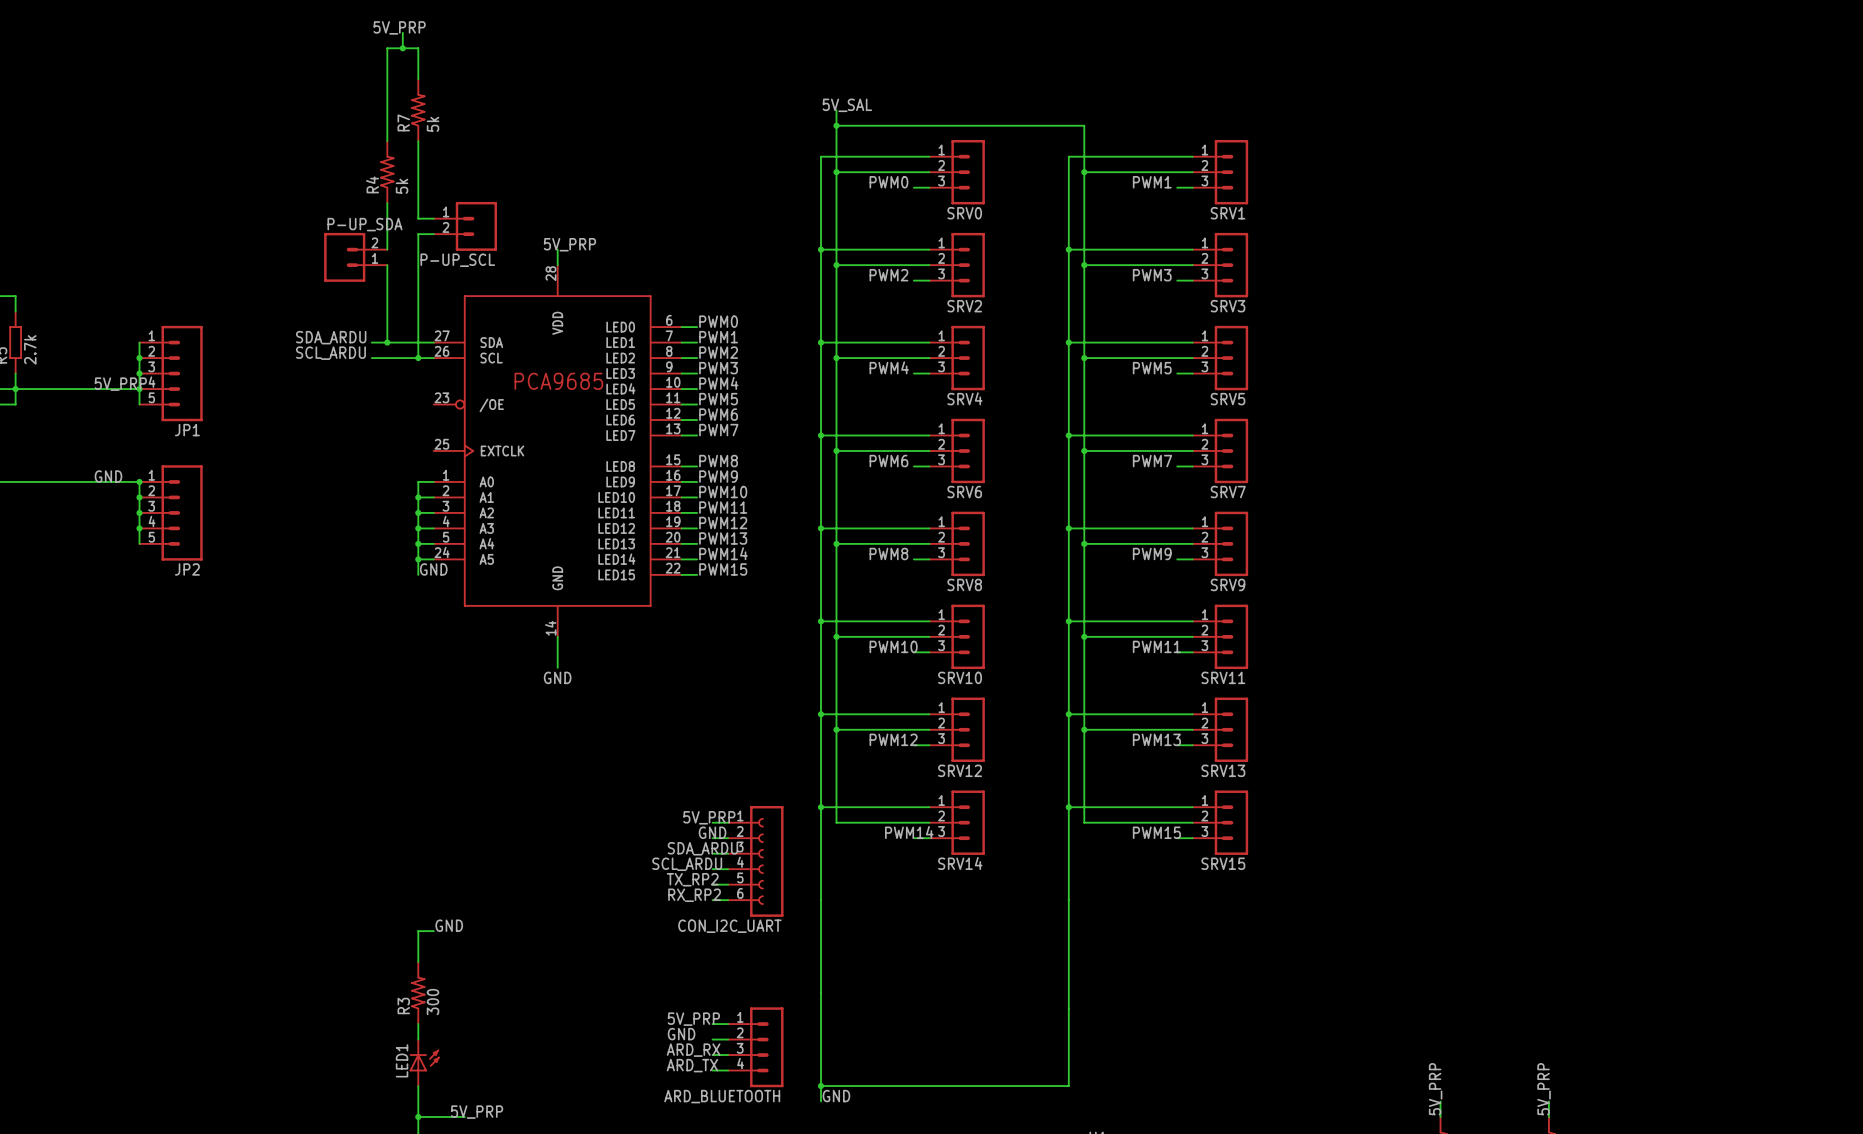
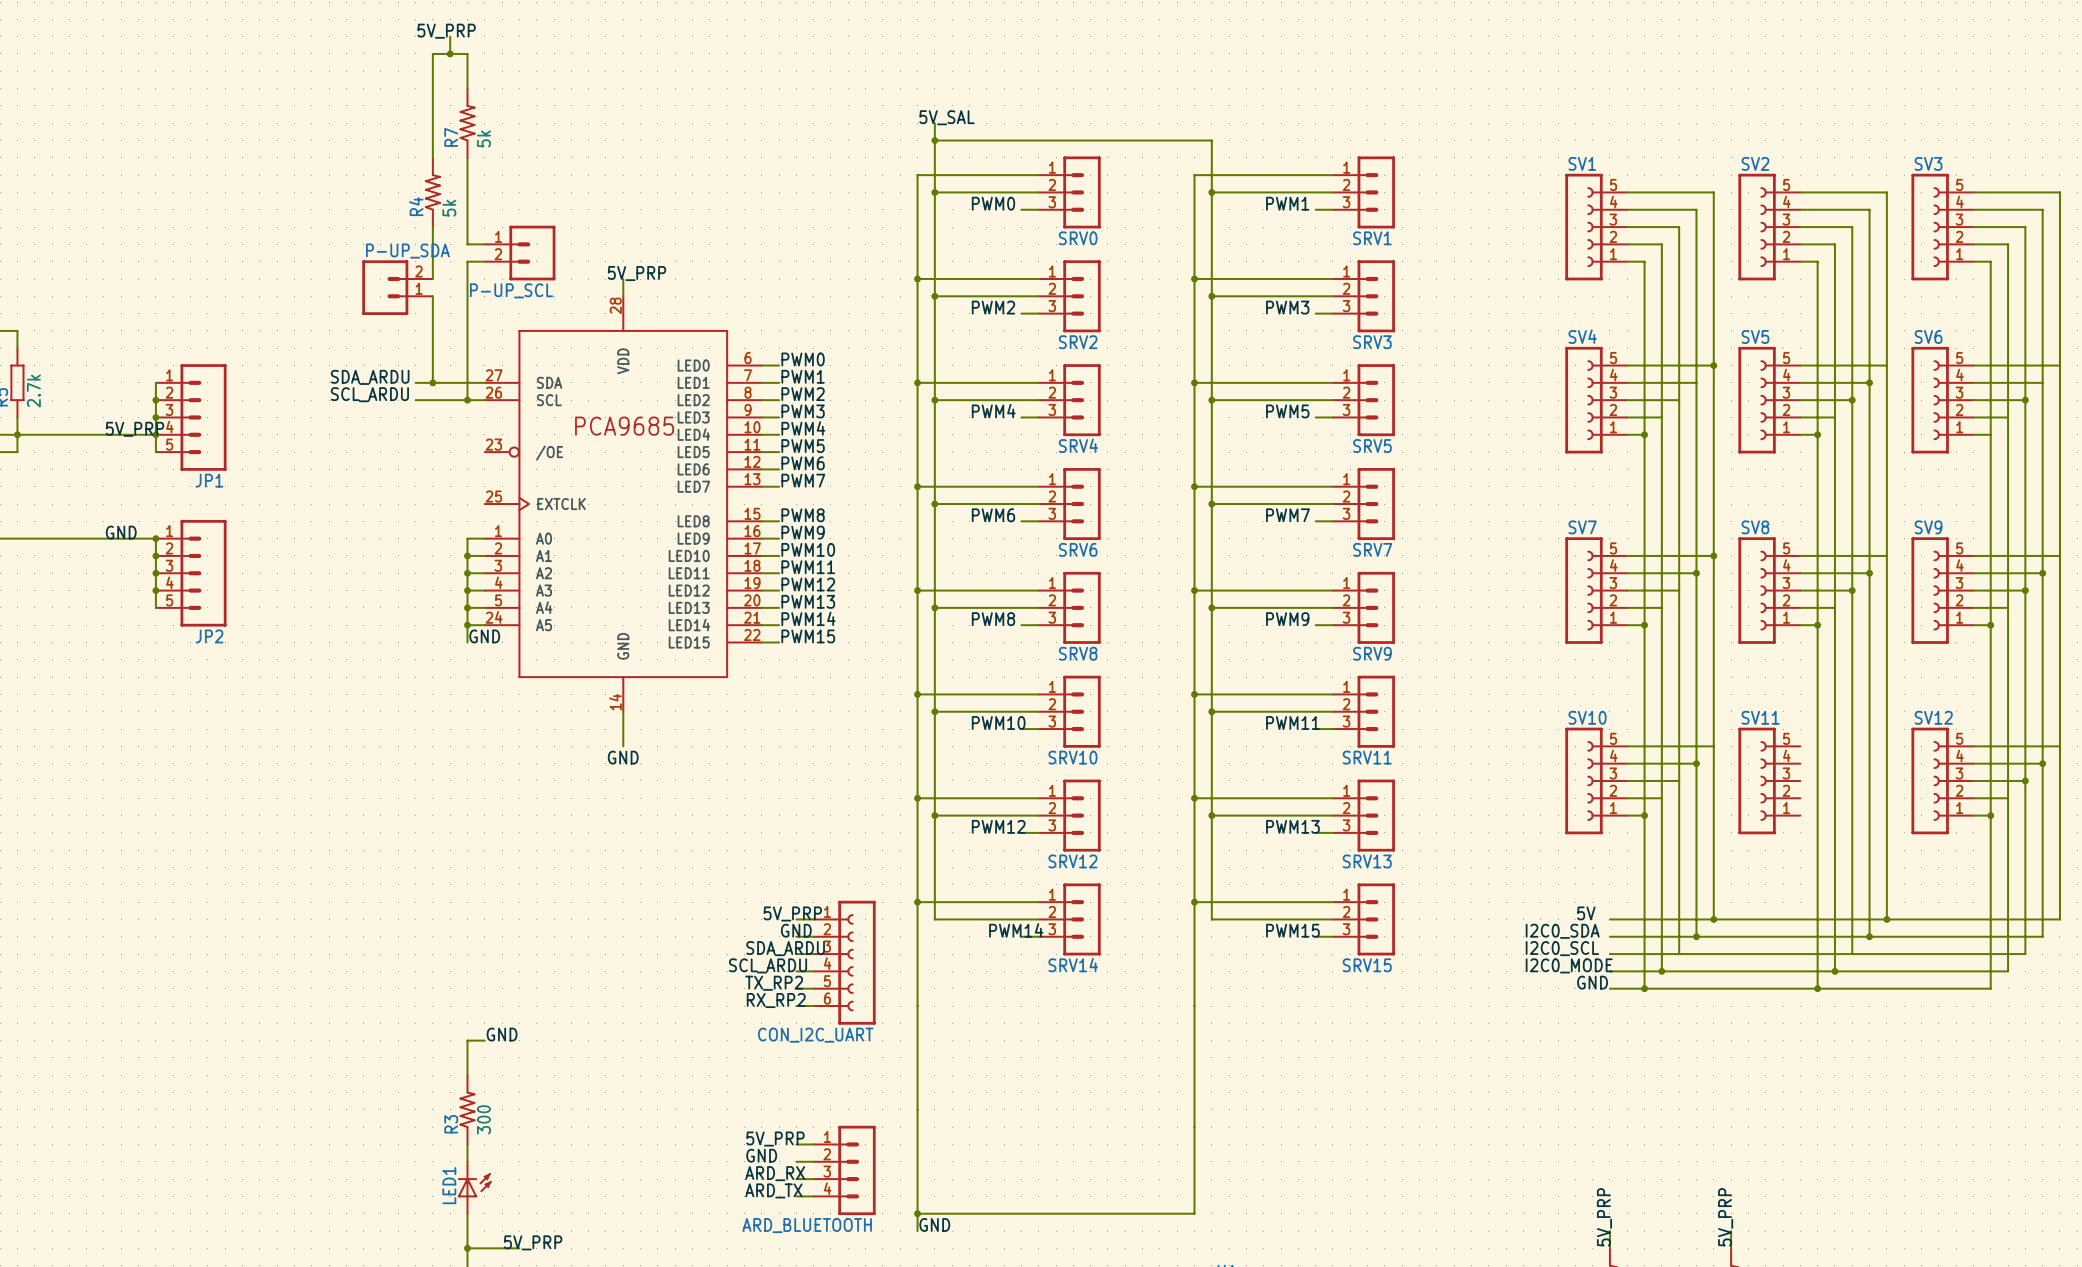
wire: none -> (1627, 192) (1713, 192) (1713, 919)
wire: none -> (1800, 192) (1886, 192) (1886, 919)
wire: none -> (1973, 192) (2059, 192) (2059, 919) (1609, 919)
wire: none -> (1627, 209) (1696, 209) (1696, 936)
wire: none -> (1800, 209) (1869, 209) (1869, 936)
wire: none -> (1973, 209) (2042, 209) (2042, 936) (1609, 936)
SV1: none -> (1596, 227)
wire: none -> (1627, 227) (1679, 227) (1679, 954)
SV2: none -> (1769, 227)
wire: none -> (1800, 227) (1852, 227) (1852, 954)
SV3: none -> (1942, 227)
wire: none -> (1973, 227) (2025, 227) (2025, 954) (1609, 954)
wire: none -> (1627, 244) (1661, 244) (1661, 971)
wire: none -> (1800, 244) (1834, 244) (1834, 971)
wire: none -> (1973, 244) (2008, 244) (2008, 971) (1609, 971)
wire: none -> (1627, 261) (1644, 261) (1644, 988)
wire: none -> (1800, 261) (1817, 261) (1817, 988)
wire: none -> (1973, 261) (1990, 261) (1990, 988) (1609, 988)
wire: none -> (1627, 365) (1713, 365)
junction: none -> (1713, 365)
wire: none -> (1800, 365) (1886, 365)
wire: none -> (1973, 365) (2059, 365)
wire: none -> (1627, 382) (1696, 382)
wire: none -> (1800, 382) (1869, 382)
junction: none -> (1869, 382)
wire: none -> (1973, 382) (2042, 382)
SV4: none -> (1596, 400)
wire: none -> (1627, 400) (1679, 400)
SV5: none -> (1769, 400)
wire: none -> (1800, 400) (1852, 400)
junction: none -> (1852, 400)
SV6: none -> (1942, 400)
wire: none -> (1973, 400) (2025, 400)
junction: none -> (2025, 400)
wire: none -> (1627, 417) (1661, 417)
wire: none -> (1800, 417) (1834, 417)
wire: none -> (1973, 417) (2008, 417)
wire: none -> (1627, 434) (1644, 434)
junction: none -> (1644, 434)
wire: none -> (1800, 434) (1817, 434)
junction: none -> (1817, 434)
wire: none -> (1973, 434) (1990, 434)
wire: none -> (1627, 555) (1713, 555)
junction: none -> (1713, 555)
wire: none -> (1800, 555) (1886, 555)
wire: none -> (1973, 555) (2059, 555)
wire: none -> (1627, 573) (1696, 573)
junction: none -> (1696, 573)
wire: none -> (1800, 573) (1869, 573)
junction: none -> (1869, 573)
wire: none -> (1973, 573) (2042, 573)
junction: none -> (2042, 573)
SV7: none -> (1596, 590)
wire: none -> (1627, 590) (1679, 590)
SV8: none -> (1769, 590)
wire: none -> (1800, 590) (1852, 590)
junction: none -> (1852, 590)
SV9: none -> (1942, 590)
wire: none -> (1973, 590) (2025, 590)
junction: none -> (2025, 590)
wire: none -> (1627, 607) (1661, 607)
wire: none -> (1800, 607) (1834, 607)
wire: none -> (1973, 607) (2008, 607)
wire: none -> (1627, 625) (1644, 625)
junction: none -> (1644, 625)
wire: none -> (1800, 625) (1817, 625)
junction: none -> (1817, 625)
wire: none -> (1973, 625) (1990, 625)
junction: none -> (1990, 625)
wire: none -> (1627, 746) (1713, 746)
wire: none -> (1973, 746) (2059, 746)
wire: none -> (1627, 763) (1696, 763)
junction: none -> (1696, 763)
wire: none -> (1973, 763) (2042, 763)
junction: none -> (2042, 763)
SV10: none -> (1596, 780)
wire: none -> (1627, 780) (1679, 780)
SV11: none -> (1769, 780)
SV12: none -> (1942, 780)
wire: none -> (1973, 780) (2025, 780)
junction: none -> (2025, 780)
wire: none -> (1627, 798) (1661, 798)
wire: none -> (1973, 798) (2008, 798)
wire: none -> (1627, 815) (1644, 815)
junction: none -> (1644, 815)
wire: none -> (1973, 815) (1990, 815)
junction: none -> (1990, 815)
label: none -> 5V (1586, 913)
junction: none -> (1713, 919)
junction: none -> (1886, 919)
label: none -> I2C0_SDA (1562, 931)
junction: none -> (1696, 936)
junction: none -> (1869, 936)
label: none -> I2C0_SCL (1562, 948)
label: none -> I2C0_MODE (1569, 965)
junction: none -> (1661, 971)
junction: none -> (1834, 971)
label: none -> GND (1592, 982)
junction: none -> (1644, 988)
junction: none -> (1817, 988)

